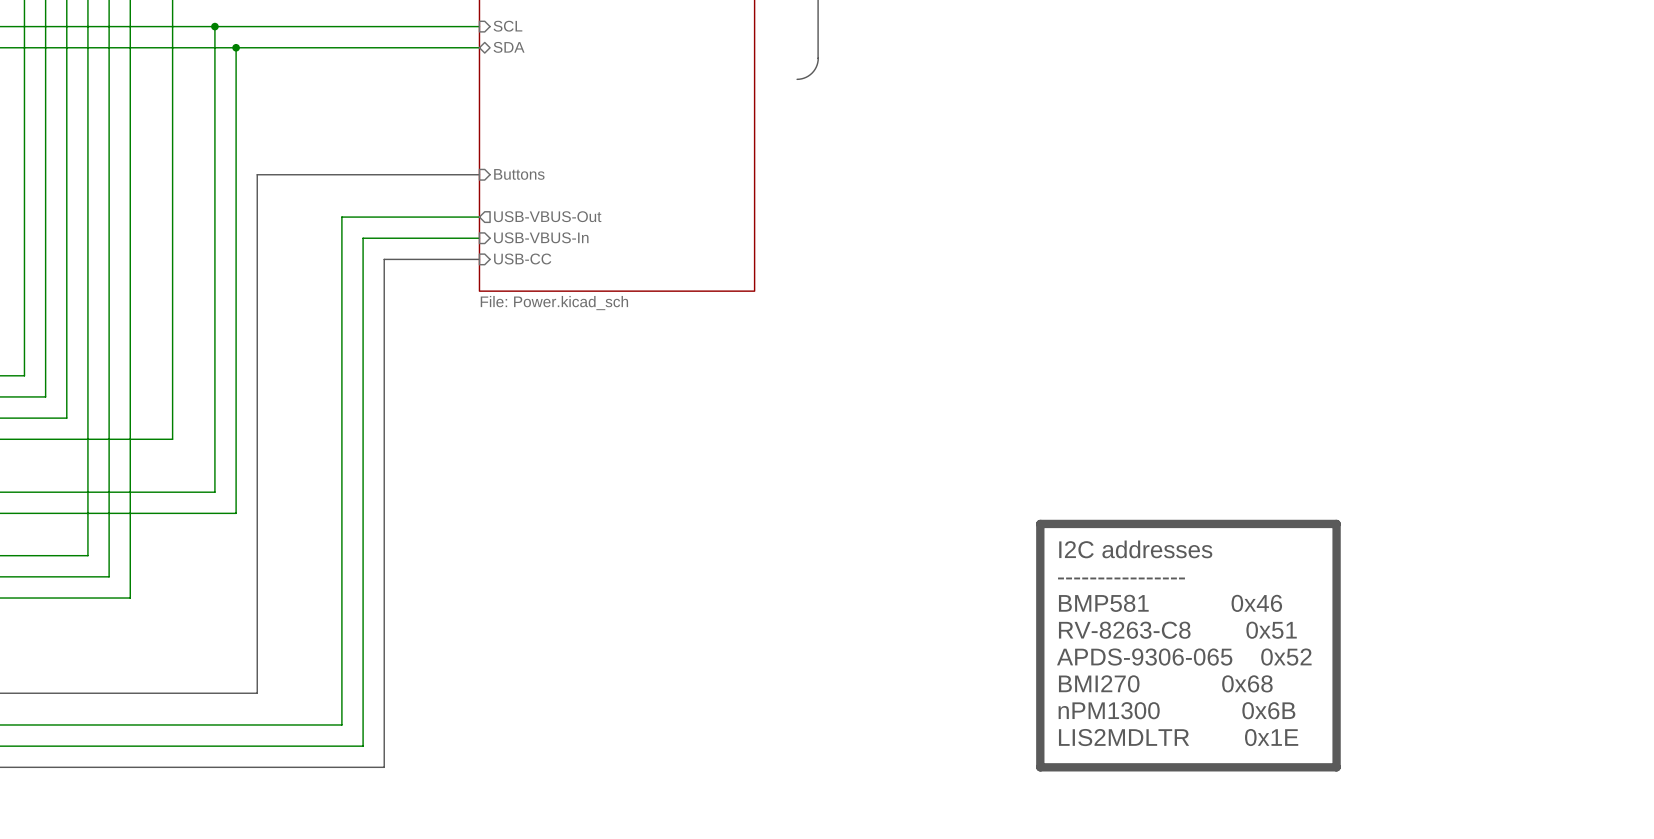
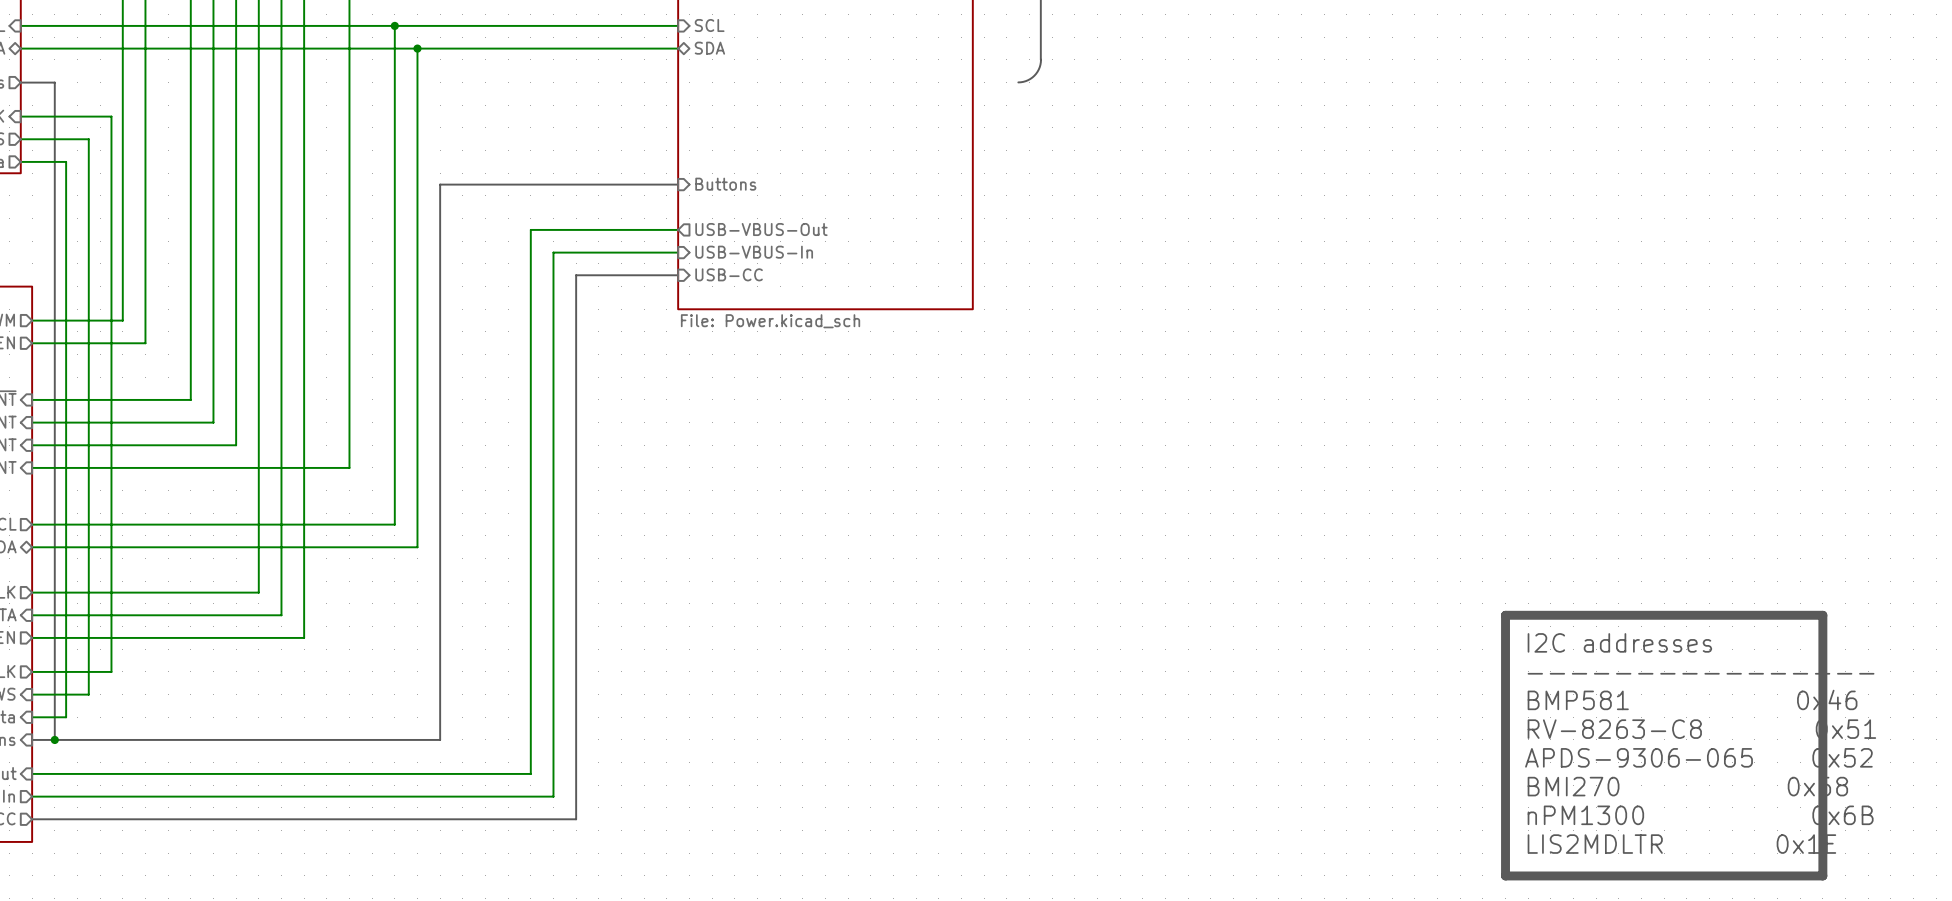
line: (1040, 523) (1336, 523) (1336, 767) (1040, 767) (1040, 523) -> none
text: I2C addresses (1135, 549) -> none
line: none -> (1505, 615) (1822, 615) (1822, 875) (1505, 875) (1505, 615)
text: ---------------- (1121, 578) -> none
text: none -> I2C addresses (1619, 642)
text: BMP581 0x46 (1170, 603) -> none
text: RV-8263-C8 0x51 (1177, 630) -> none
text: none -> ---------------- (1701, 673)
text: none -> BMP581 0x46 (1692, 699)
text: APDS-9306-065 0x52 (1184, 657) -> none
text: BMI270 0x68 (1165, 683) -> none
text: none -> RV-8263-C8 0x51 (1701, 729)
text: none -> APDS-9306-065 0x52 (1698, 757)
text: nPM1300 0x6B (1176, 710) -> none
text: none -> BMI270 0x68 (1687, 786)
text: LIS2MDLTR 0x1E (1178, 737) -> none
text: none -> nPM1300 0x6B (1700, 815)
text: none -> LIS2MDLTR 0x1E (1681, 844)

